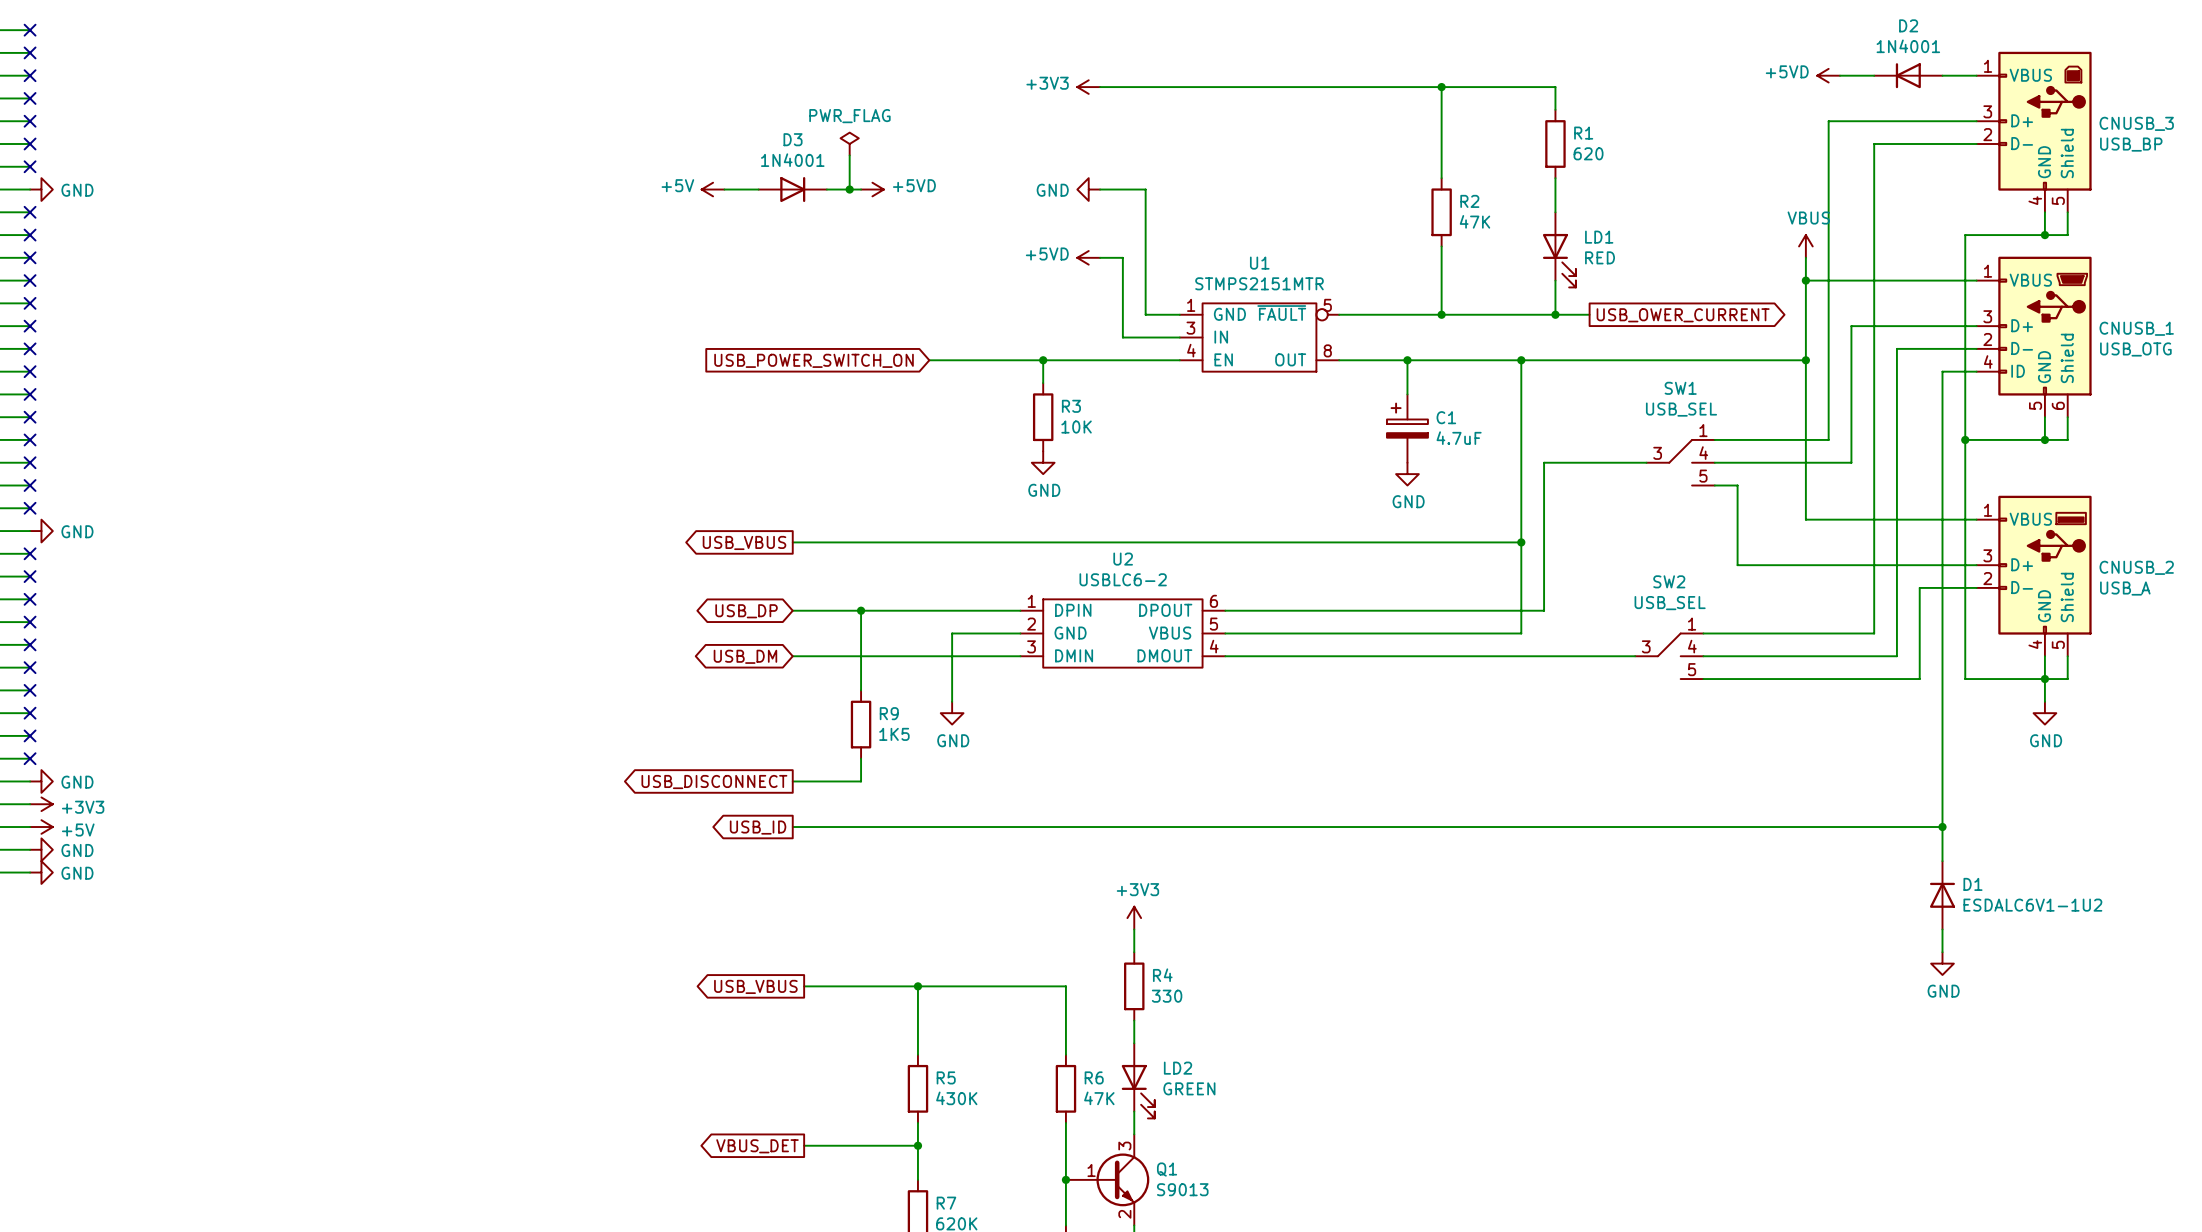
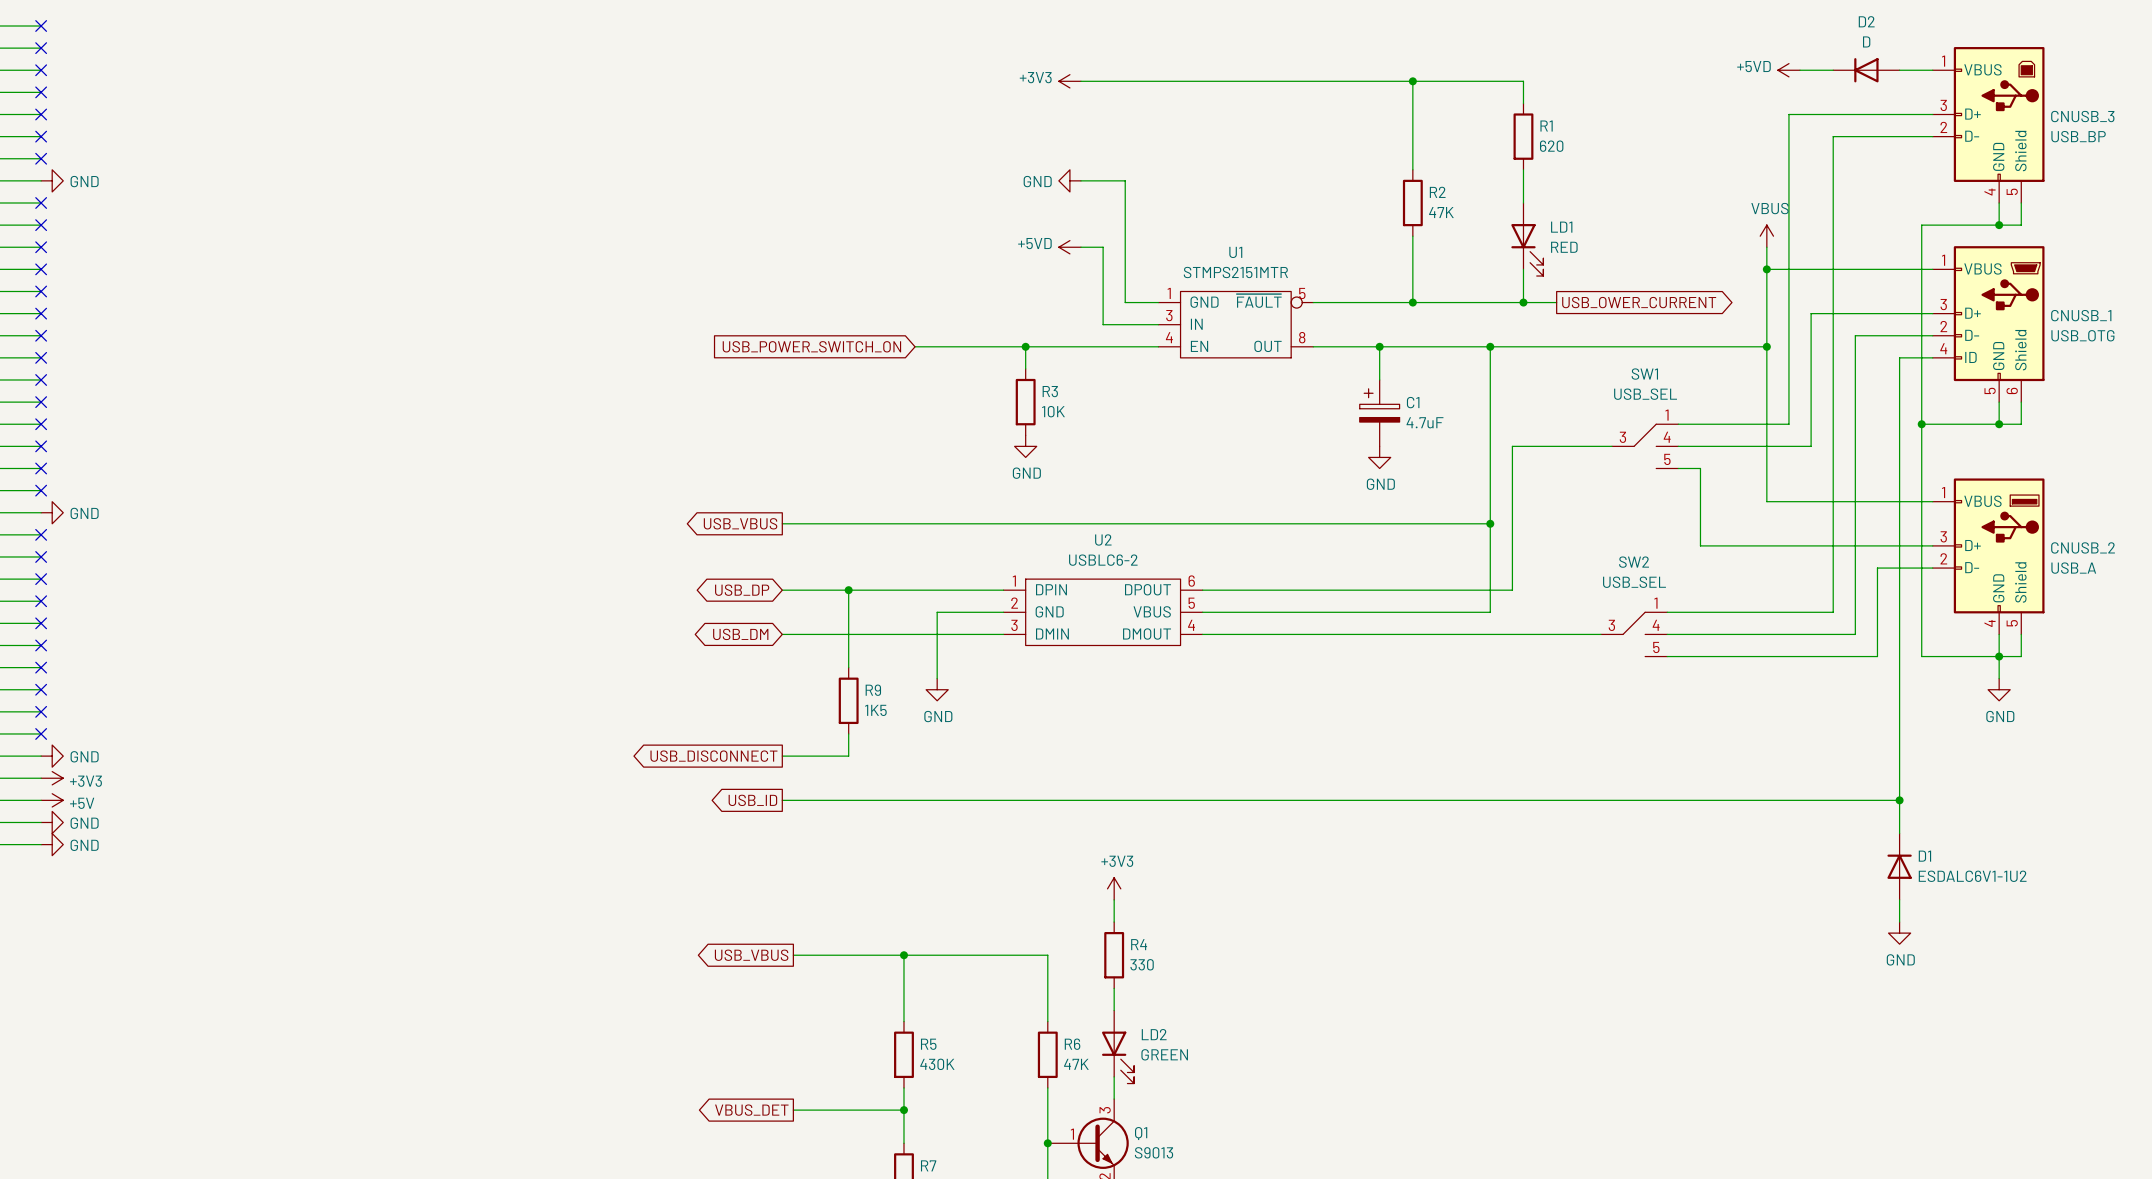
D2 value: 1N4001 (1908, 46) -> D (1866, 41)
power symbol: PWR_FLAG (849, 143) -> none
wire: (849, 155) (849, 189) -> none
power symbol: +5V (713, 189) -> none
wire: (724, 189) (758, 189) -> none
D3: 1N4001 (792, 189) -> none
wire: (826, 189) (861, 189) -> none
junction: (849, 189) -> none
power symbol: +5VD (872, 189) -> none

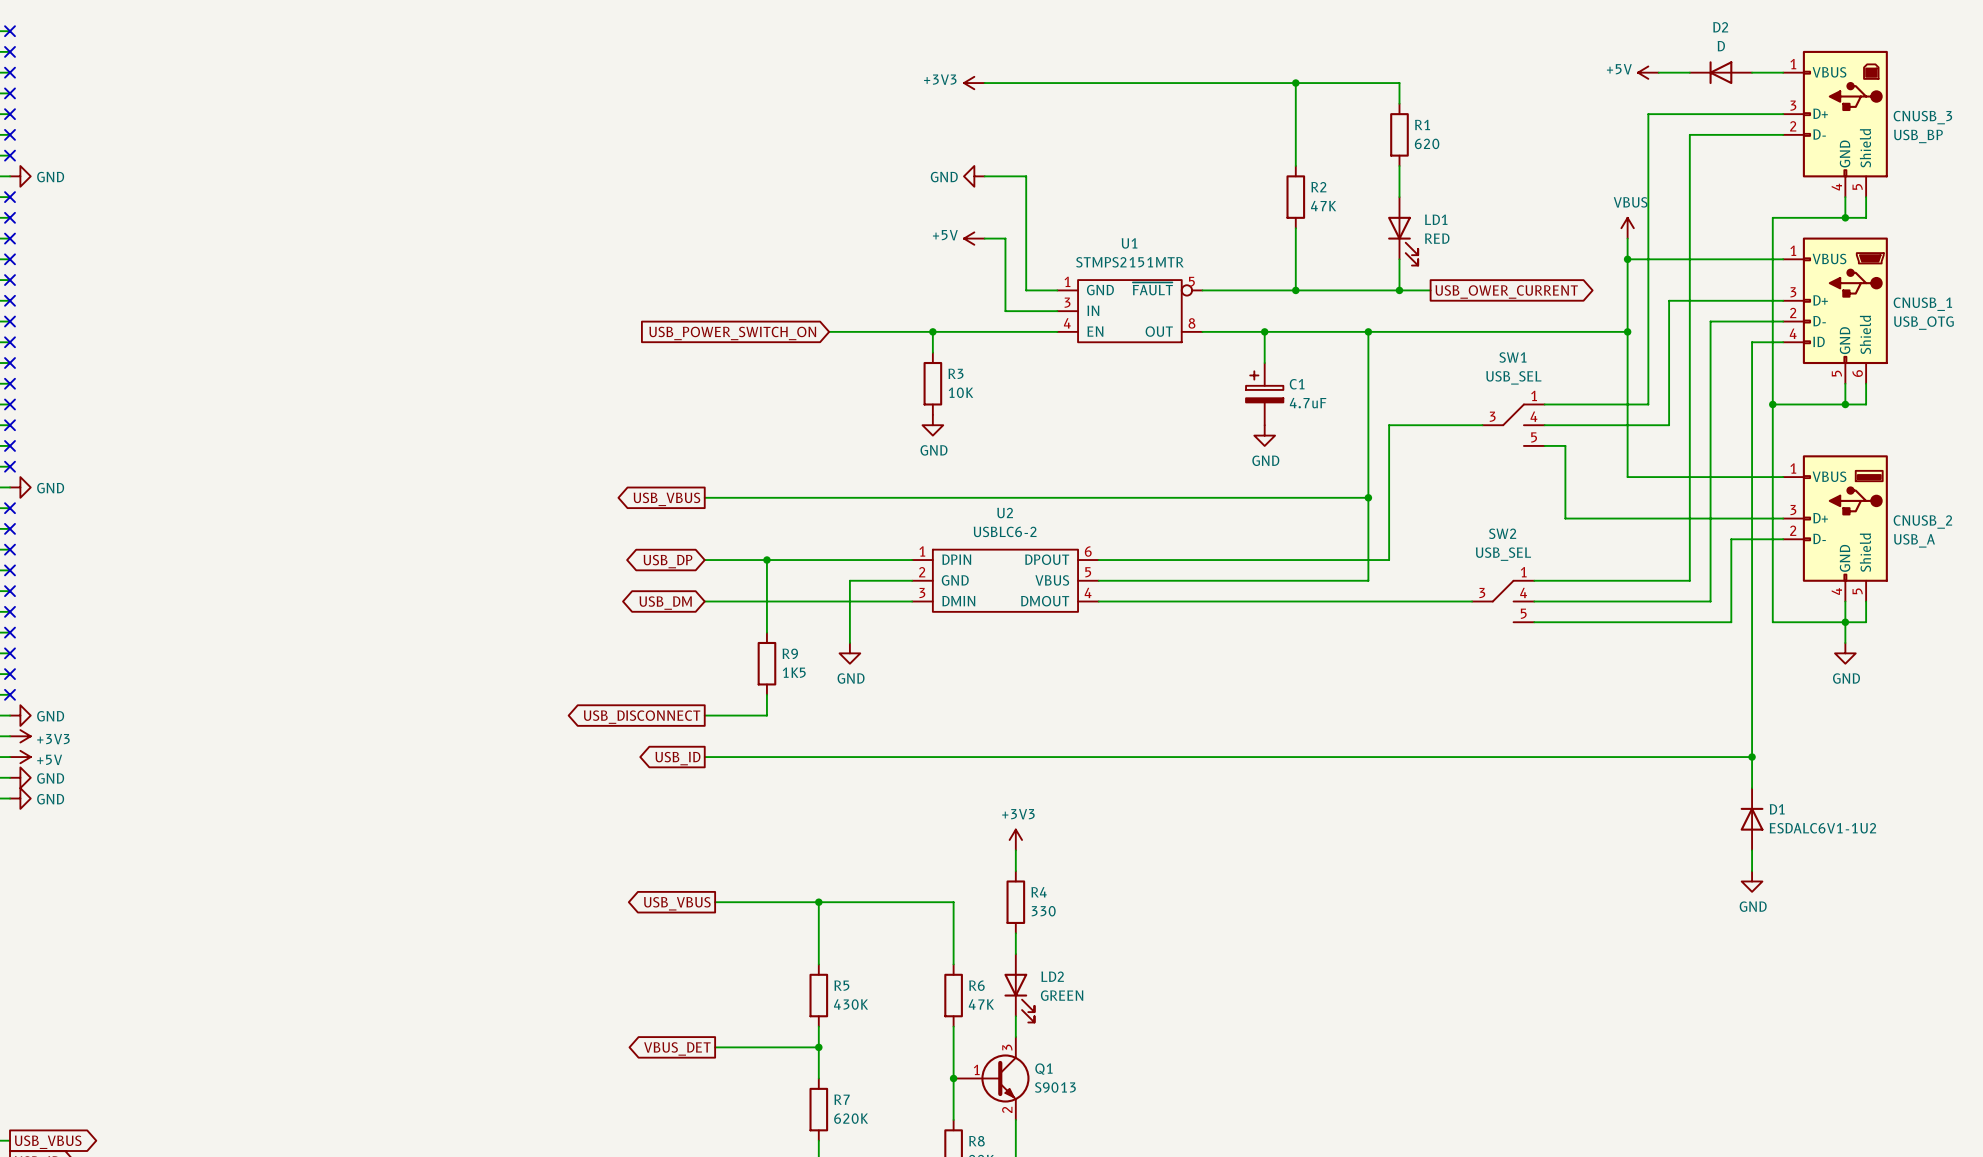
power symbol: +5VD (1788, 70) -> +5V (1648, 72)
power symbol: +5VD (1069, 247) -> +5V (974, 238)

